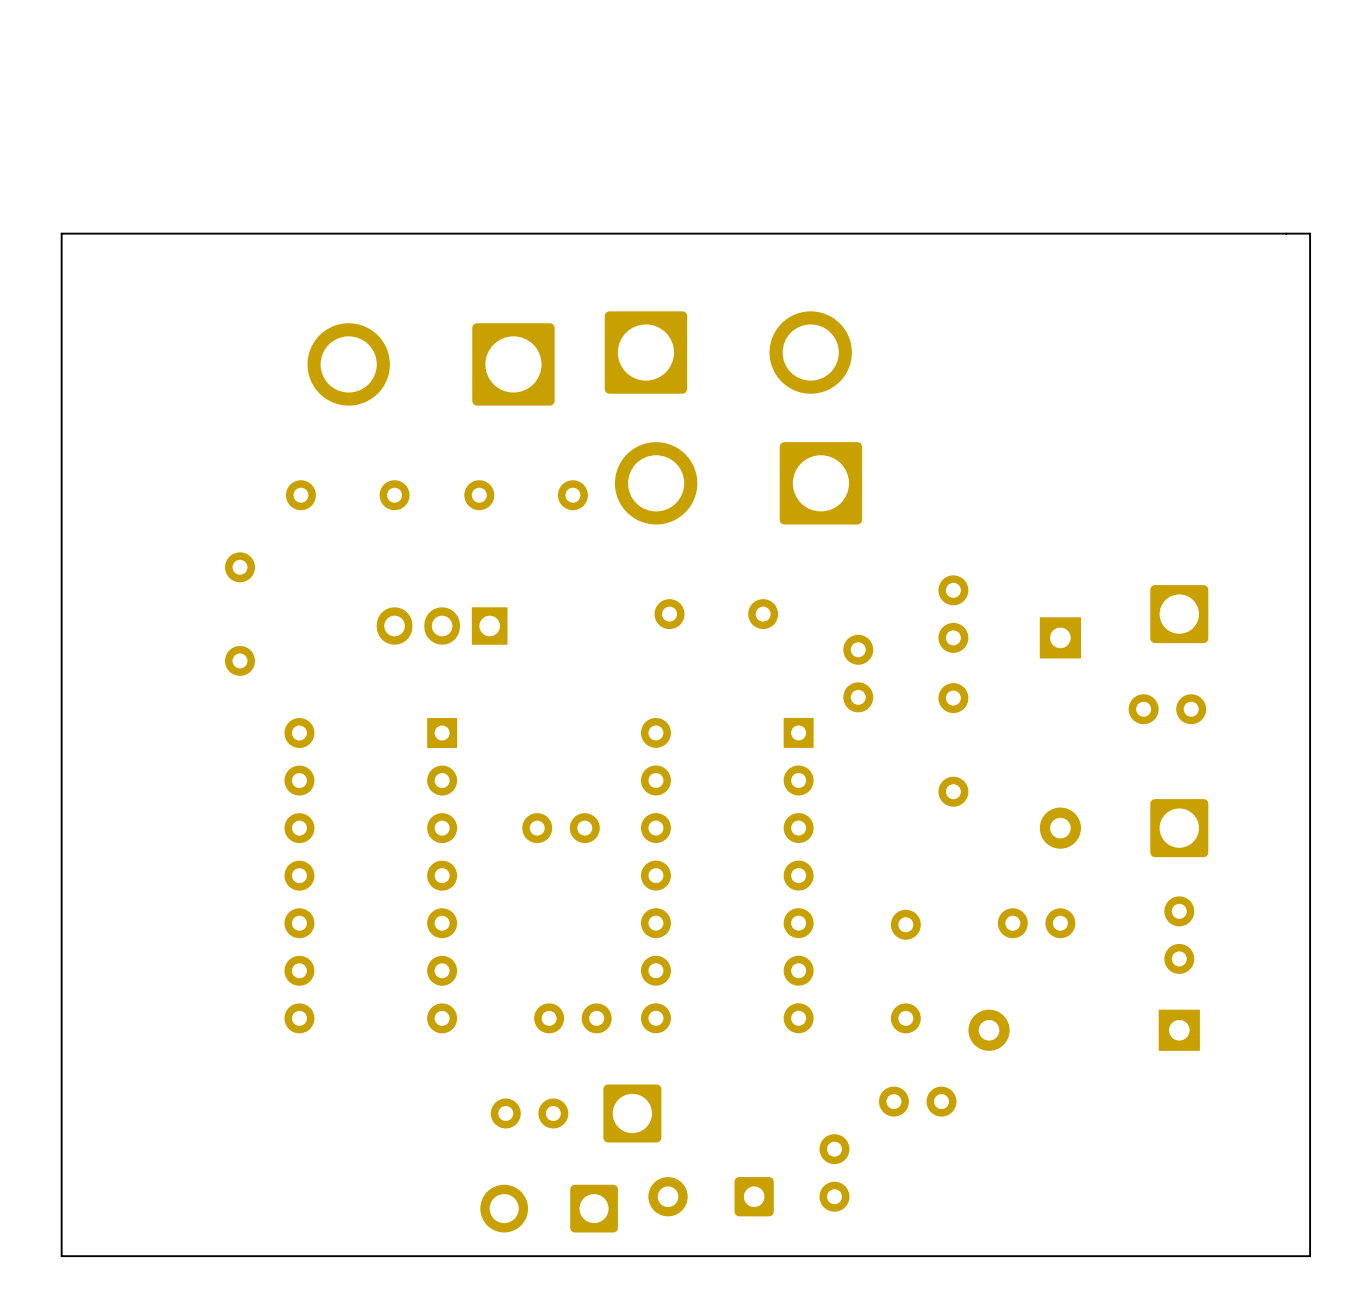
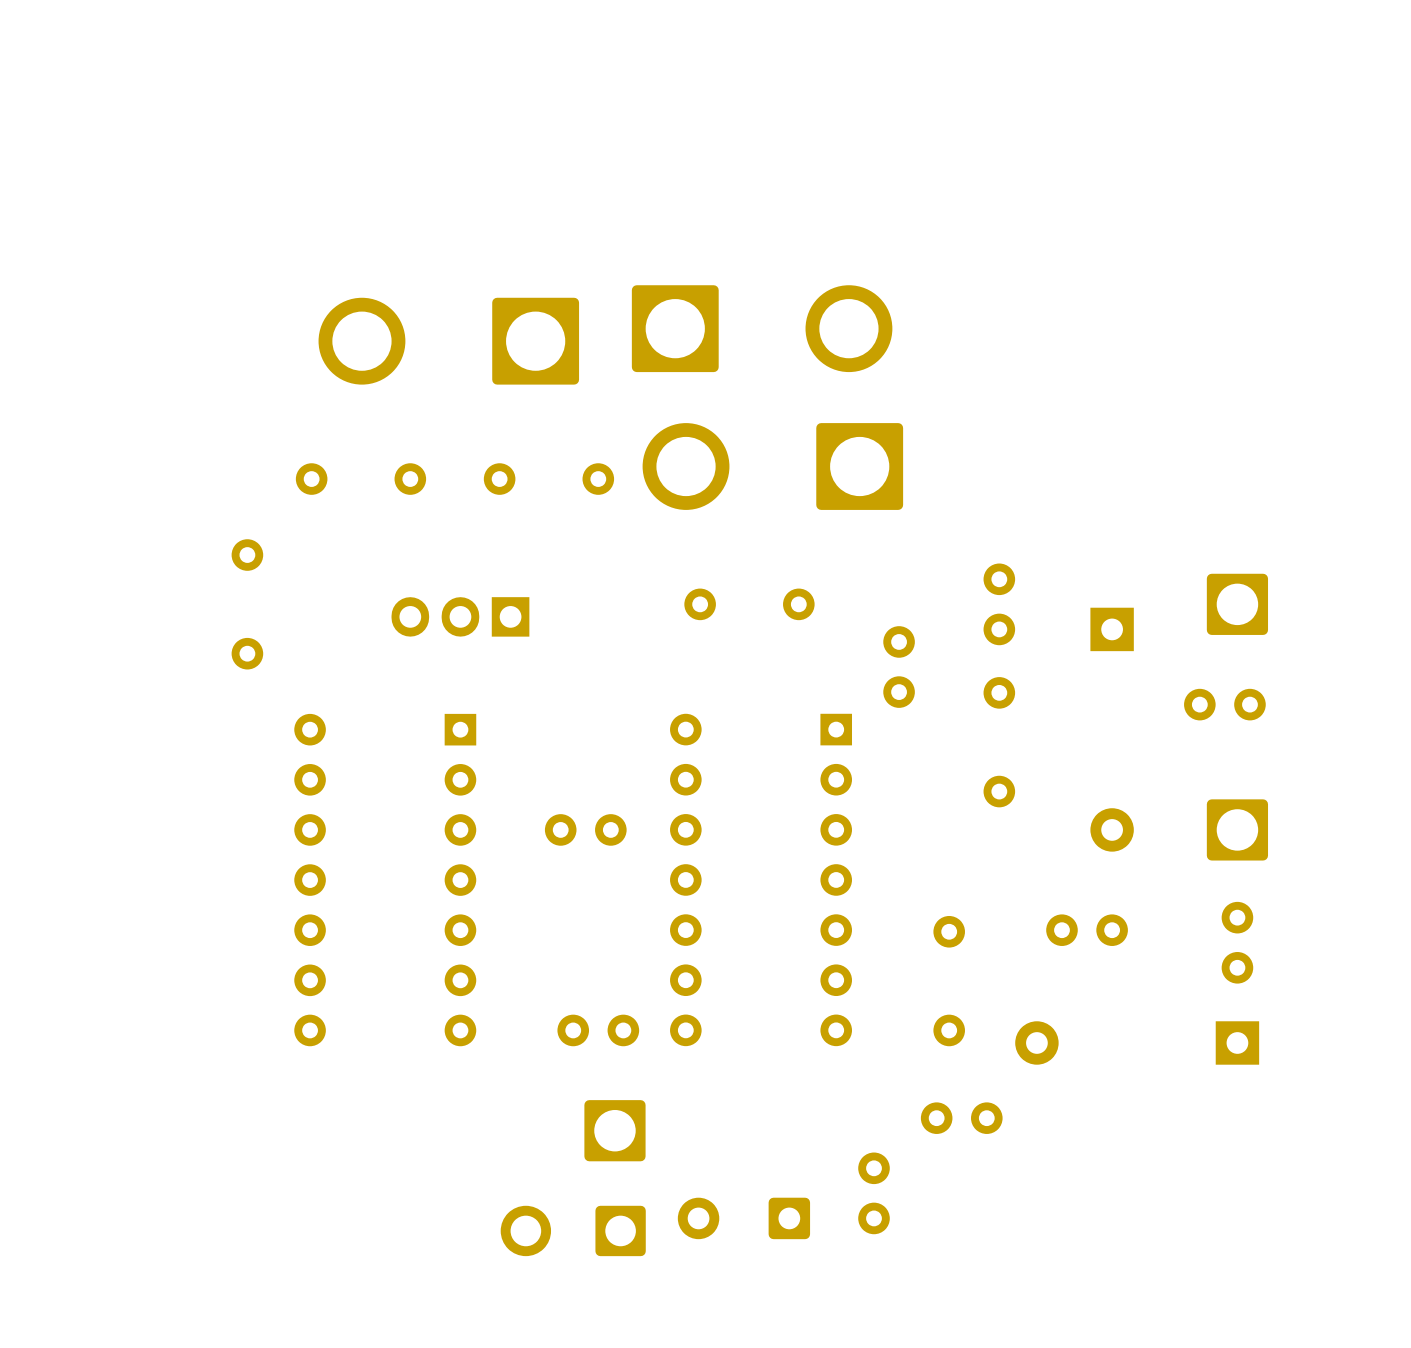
board edge: (1310, 233) (1310, 1256) (61, 1256) (61, 233) (1310, 233) -> none
part: (529, 1113) -> none
part position: (632, 1113) -> (614, 1130)

